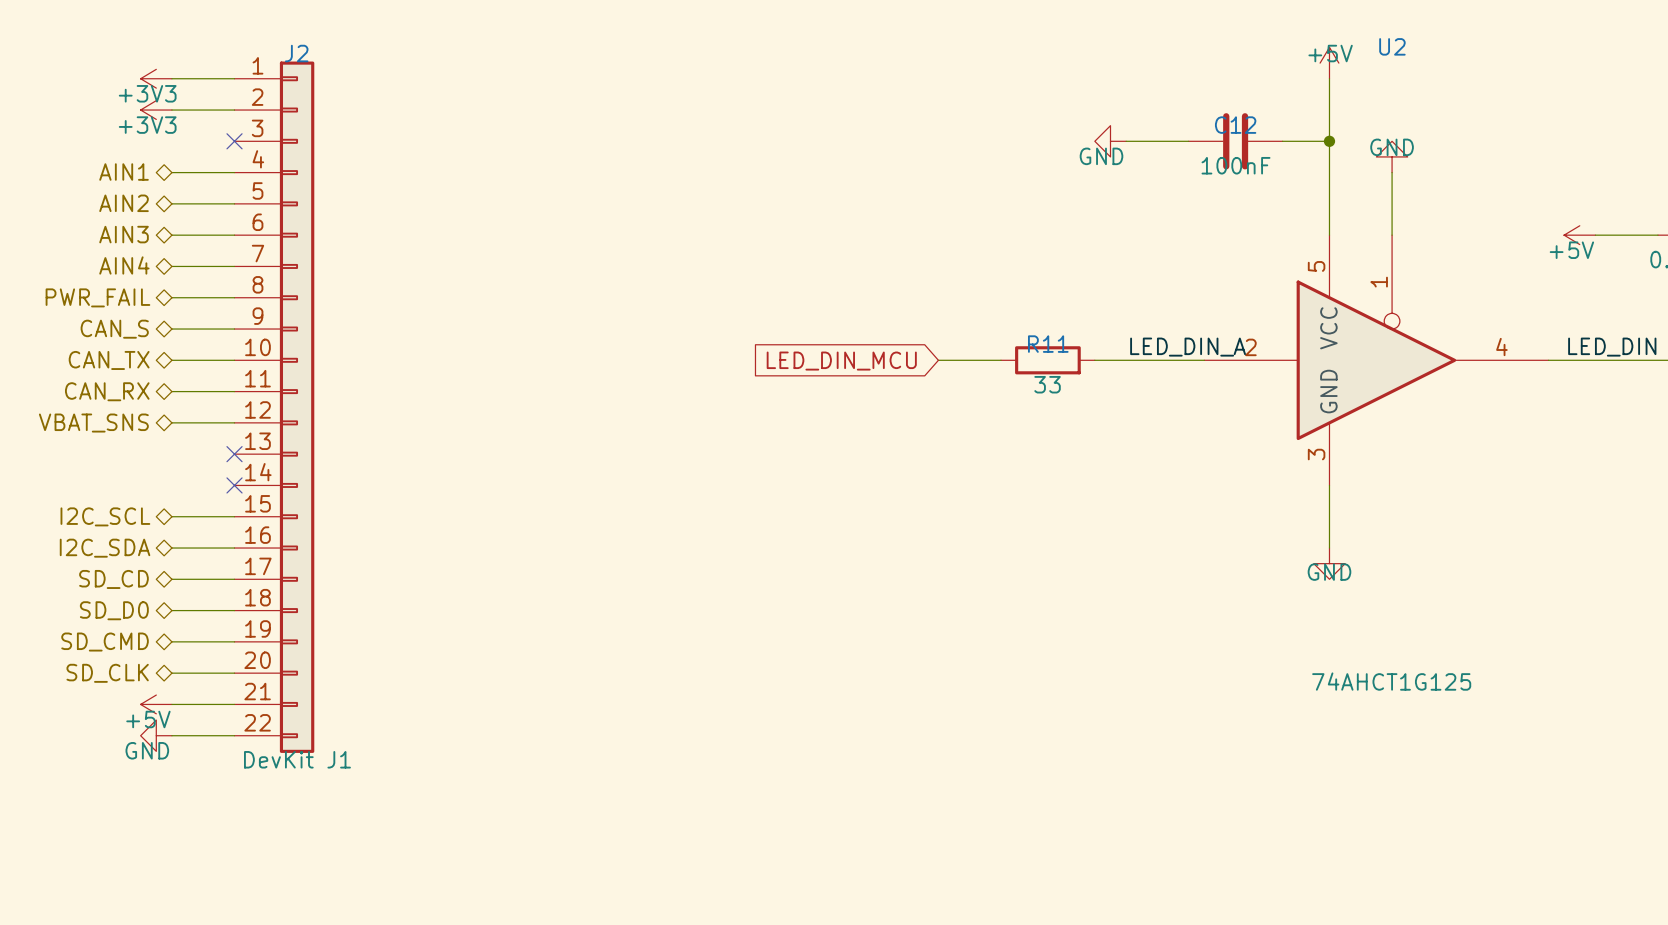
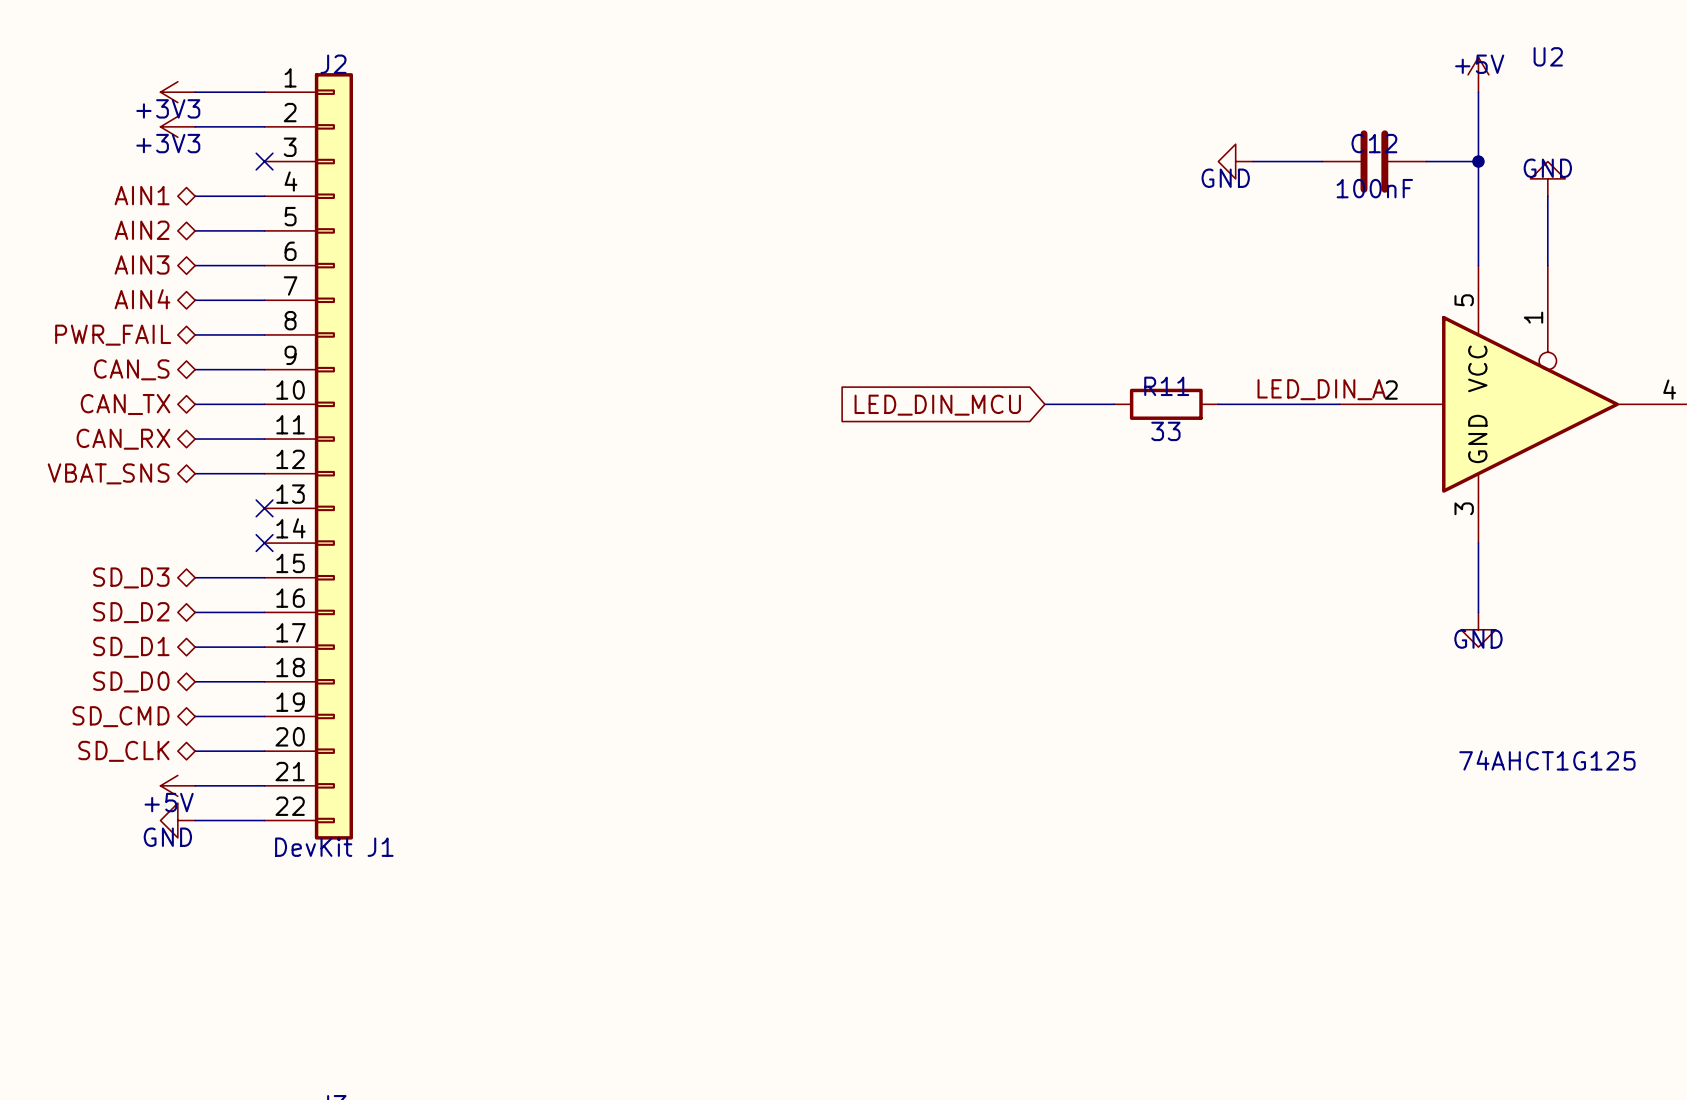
hierarchical label: I2C_SCL (105, 516) -> SD_D3 (131, 577)
hierarchical label: I2C_SDA (105, 548) -> SD_D2 (131, 612)
hierarchical label: SD_CD (113, 579) -> SD_D1 (131, 647)

